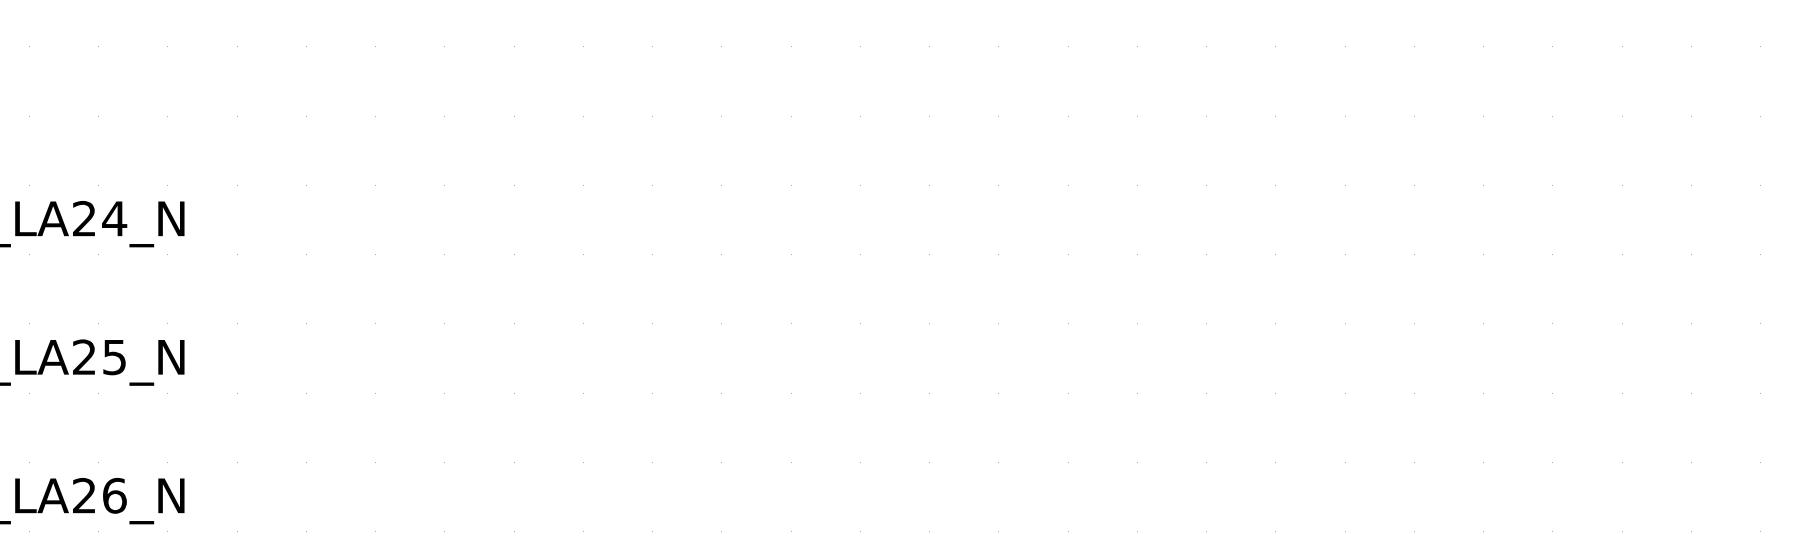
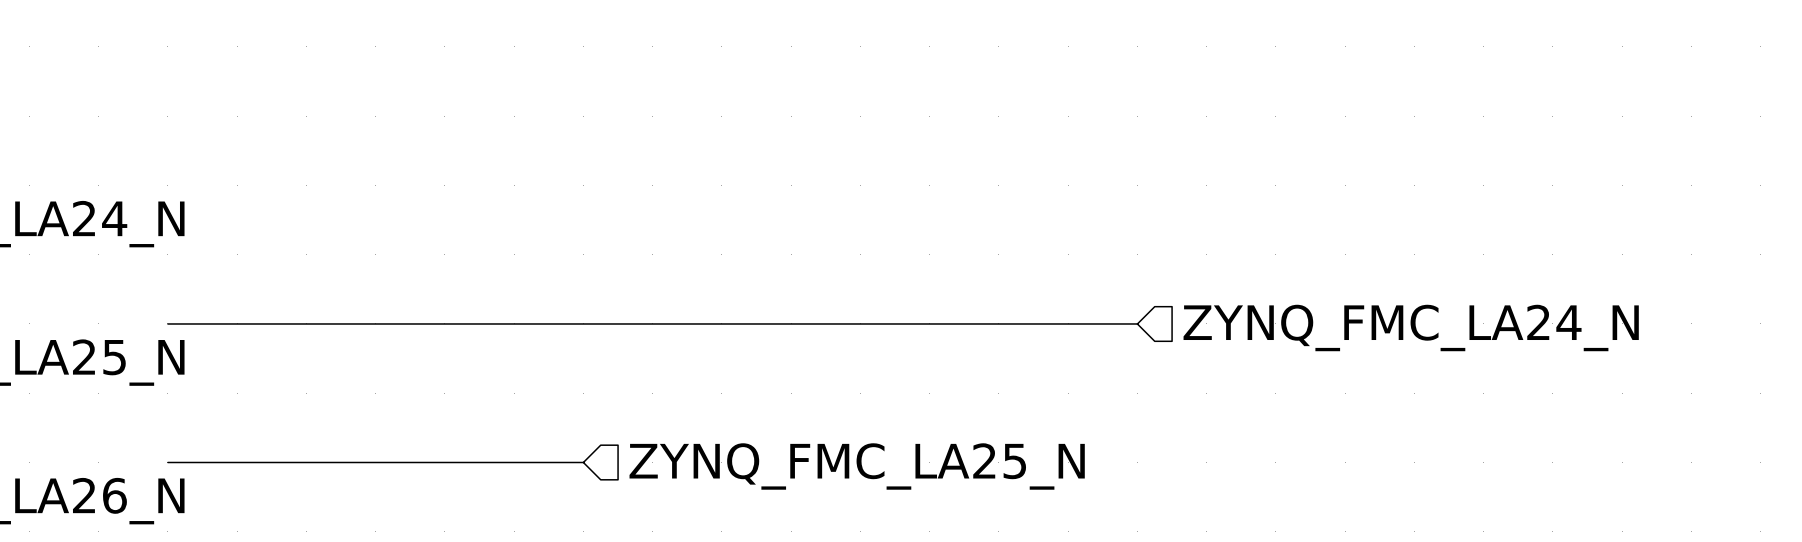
wire: none -> (167, 323) (1137, 323)
hierarchical label: none -> ZYNQ_FMC_LA24_N (1411, 327)
wire: none -> (167, 462) (583, 462)
hierarchical label: none -> ZYNQ_FMC_LA25_N (857, 466)

